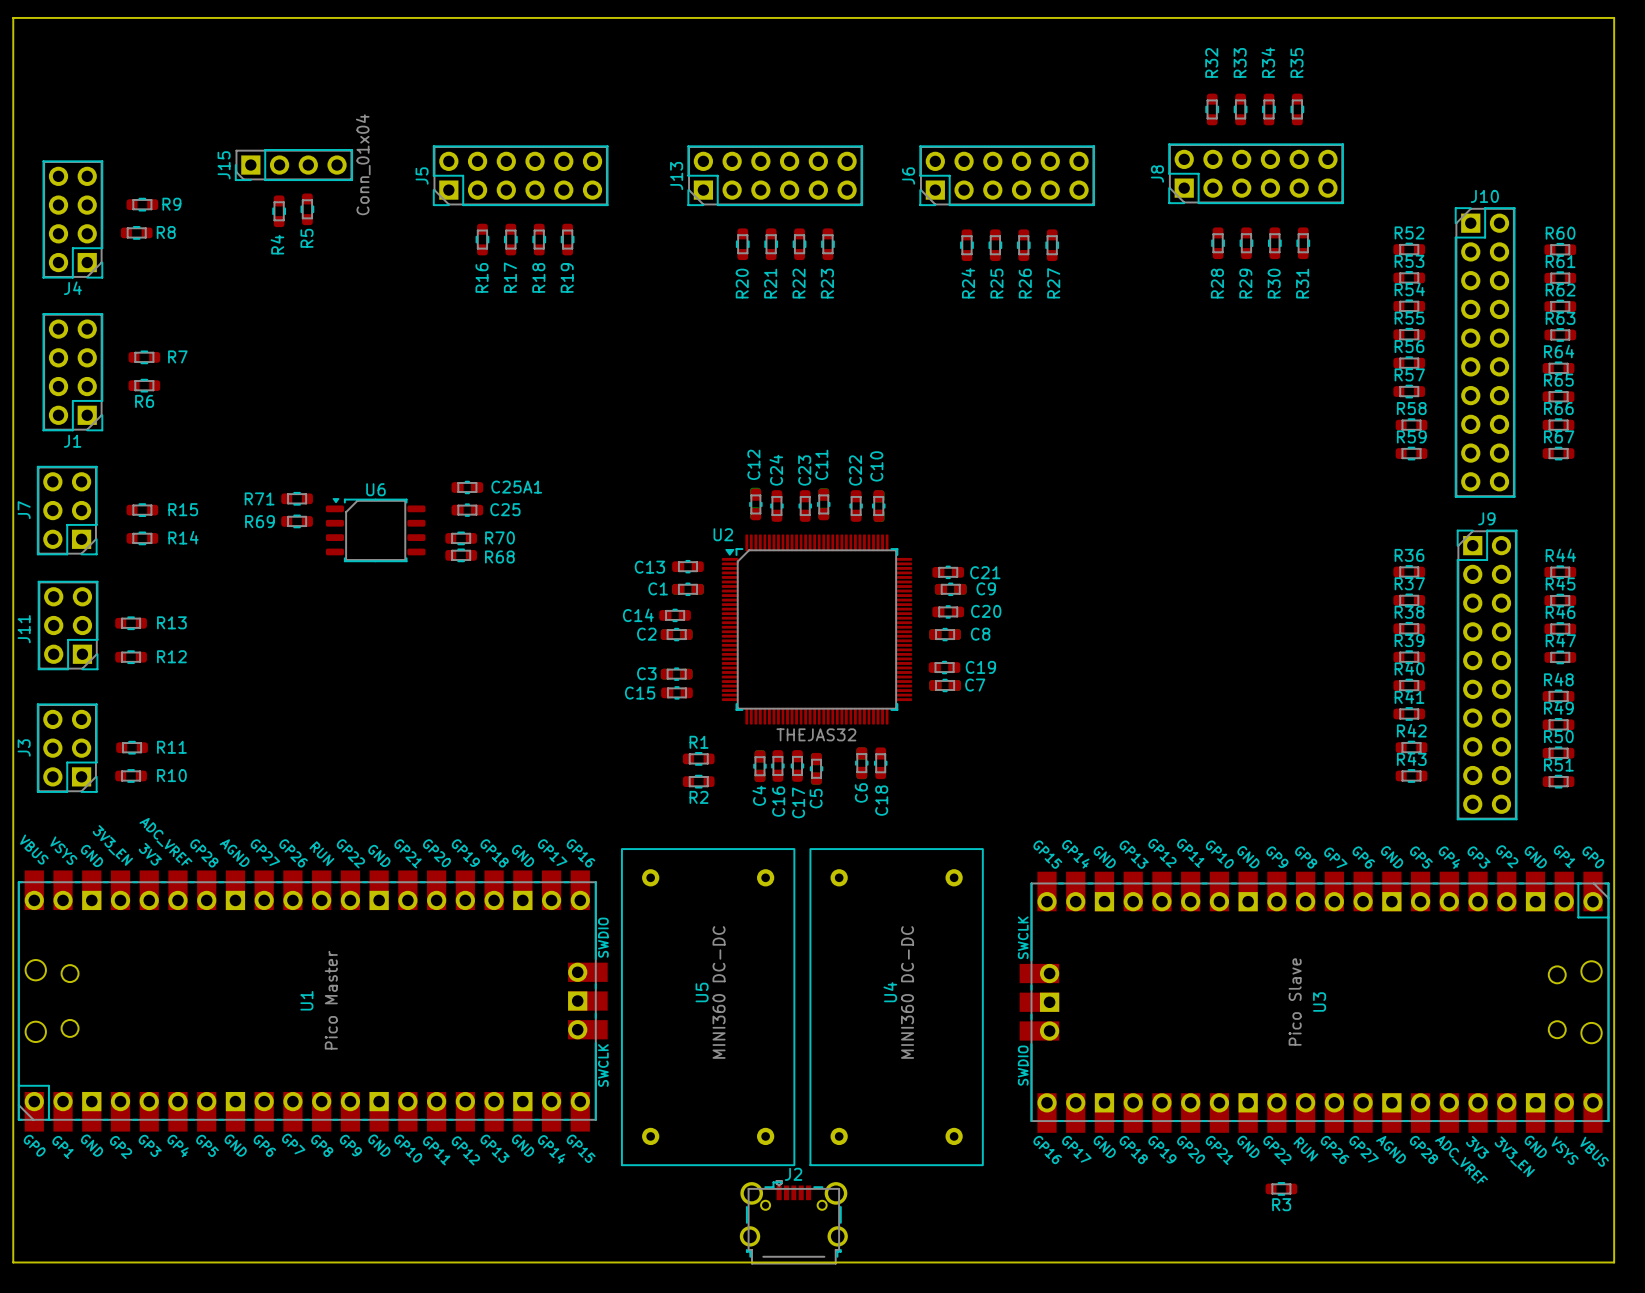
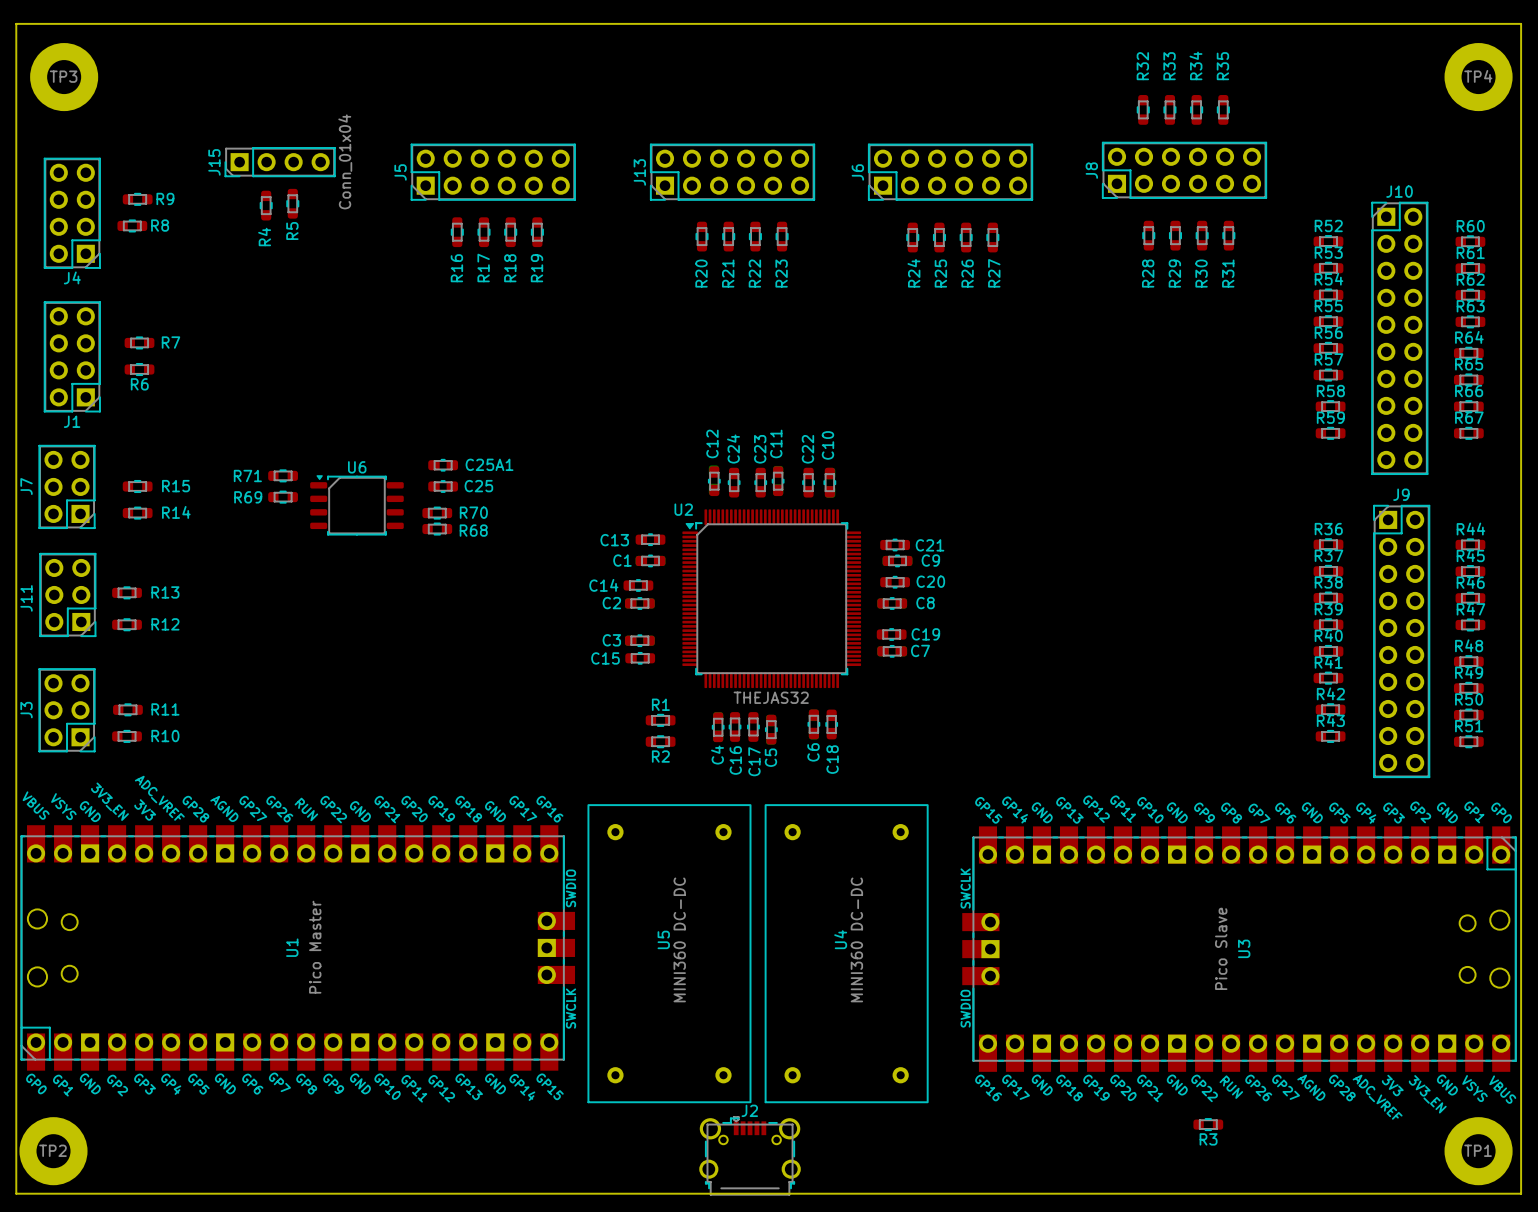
TP3: none -> (64, 77)
TP4: none -> (1478, 77)
TP2: none -> (53, 1151)
TP1: none -> (1478, 1151)

